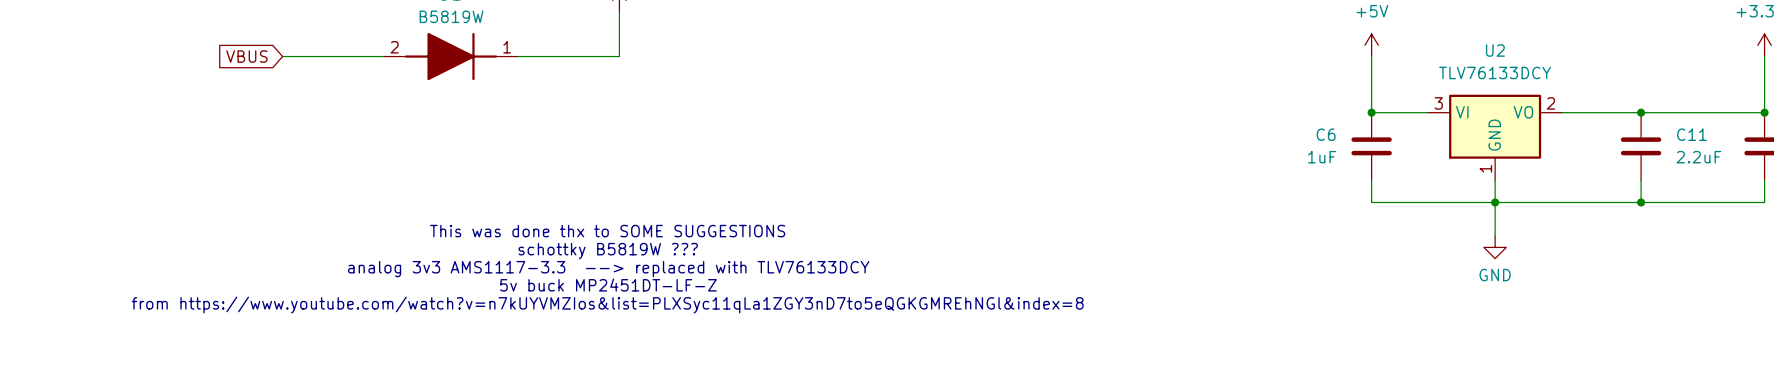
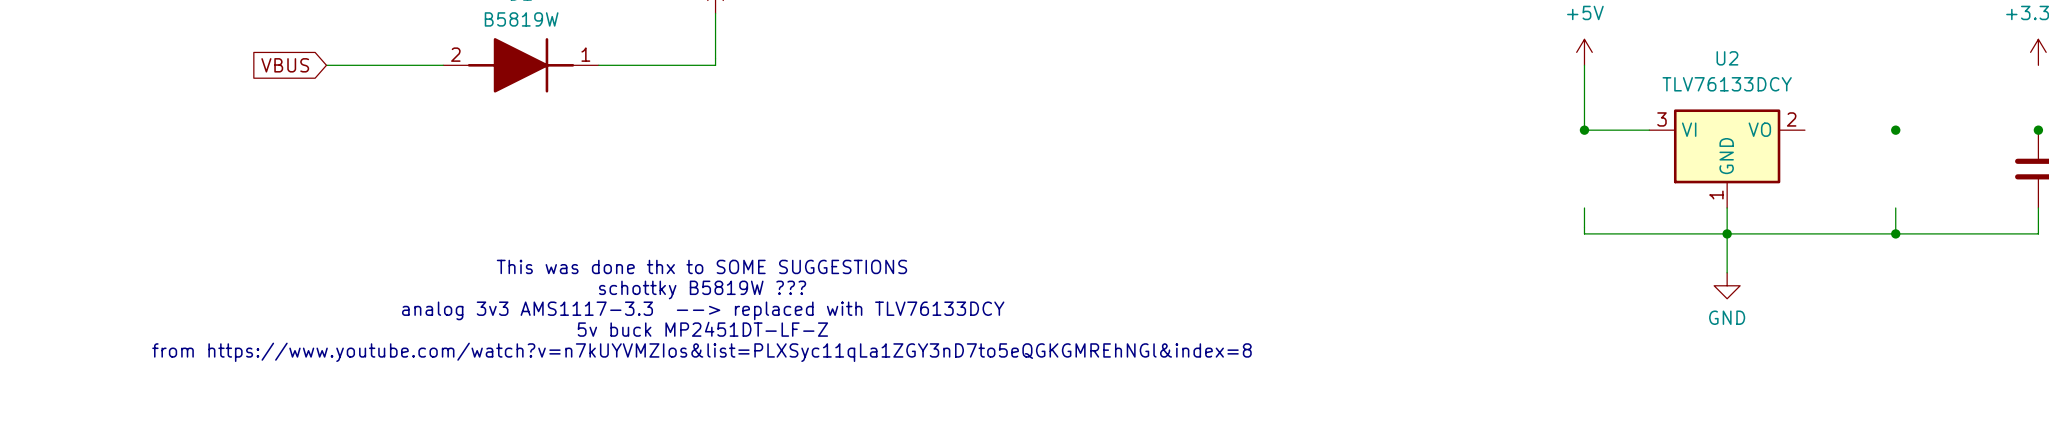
wire: (1764, 56) (1764, 112) (1562, 112) -> none
C6: 1uF (1371, 146) -> none
C11: 2.2uF (1641, 146) -> none

